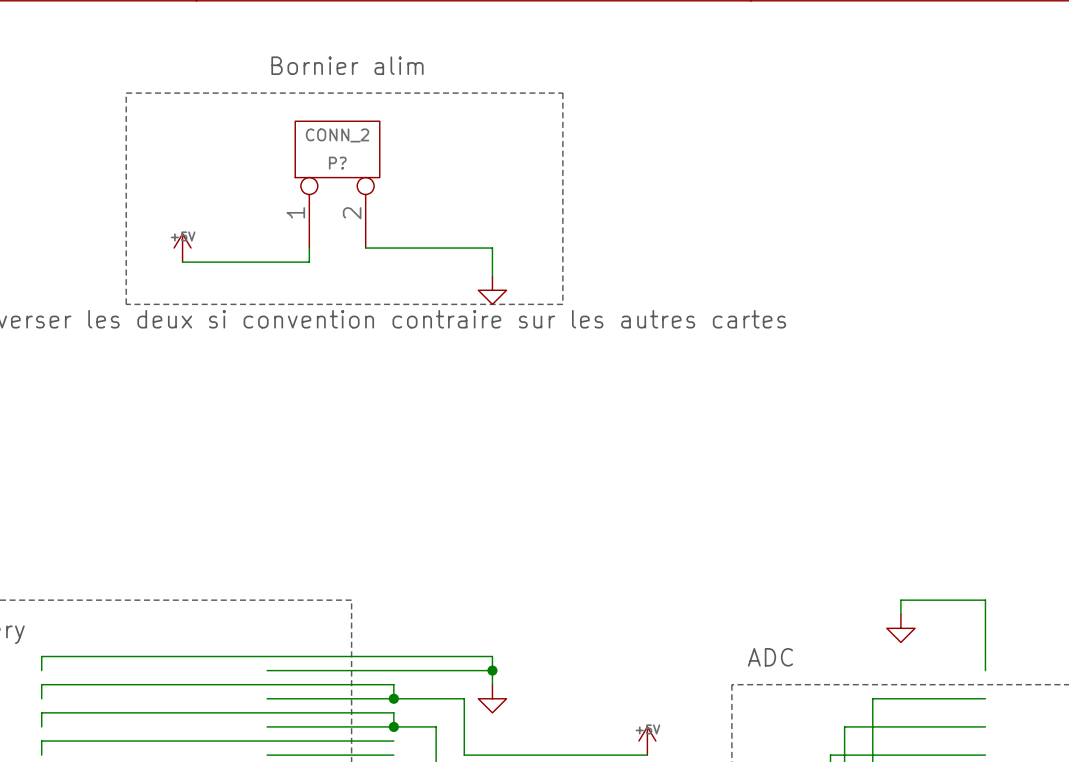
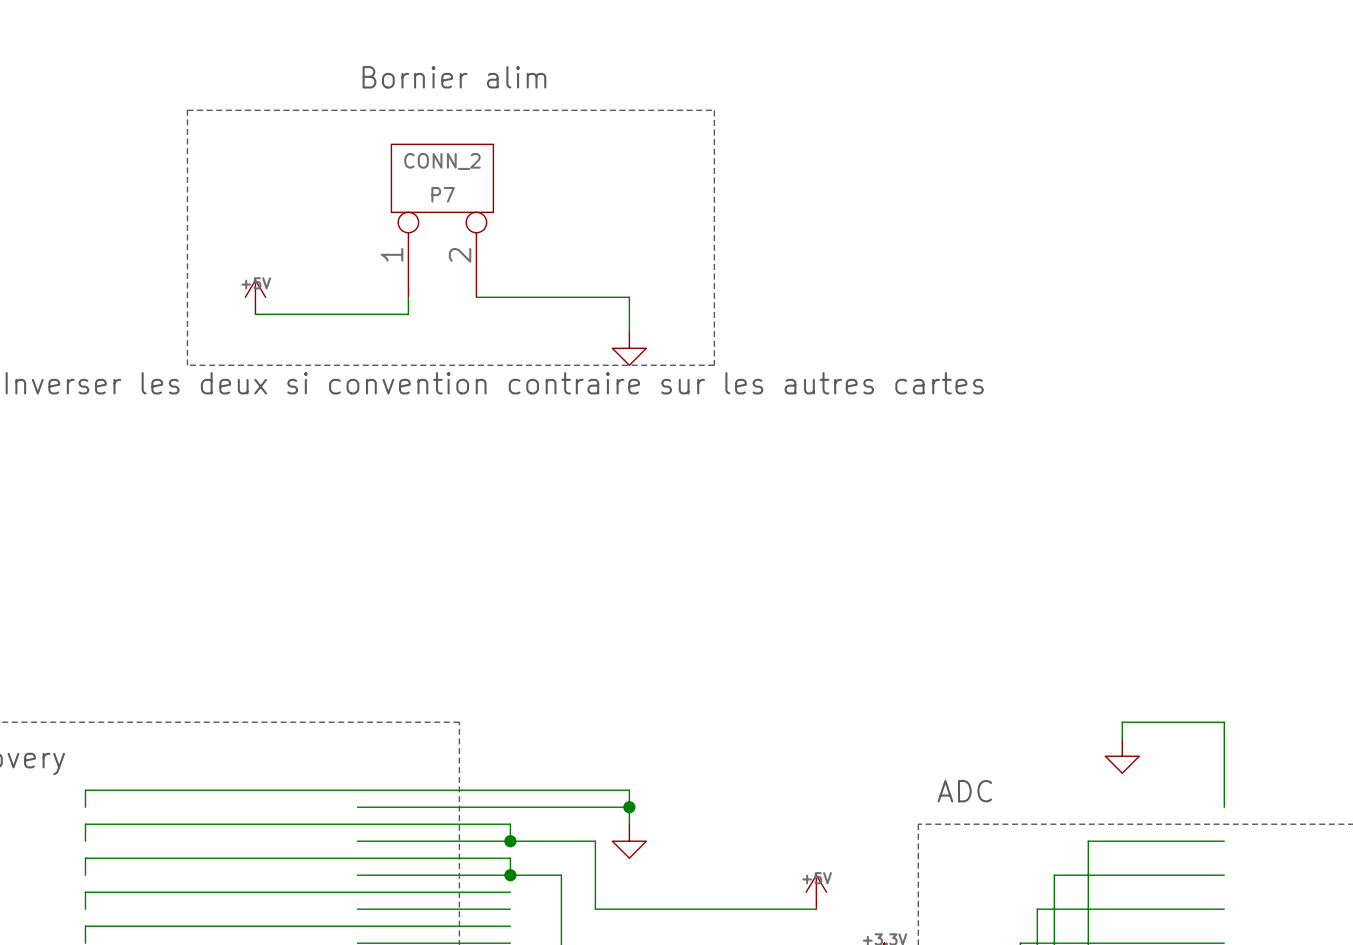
P? name: P? (337, 163) -> P7 (443, 194)

